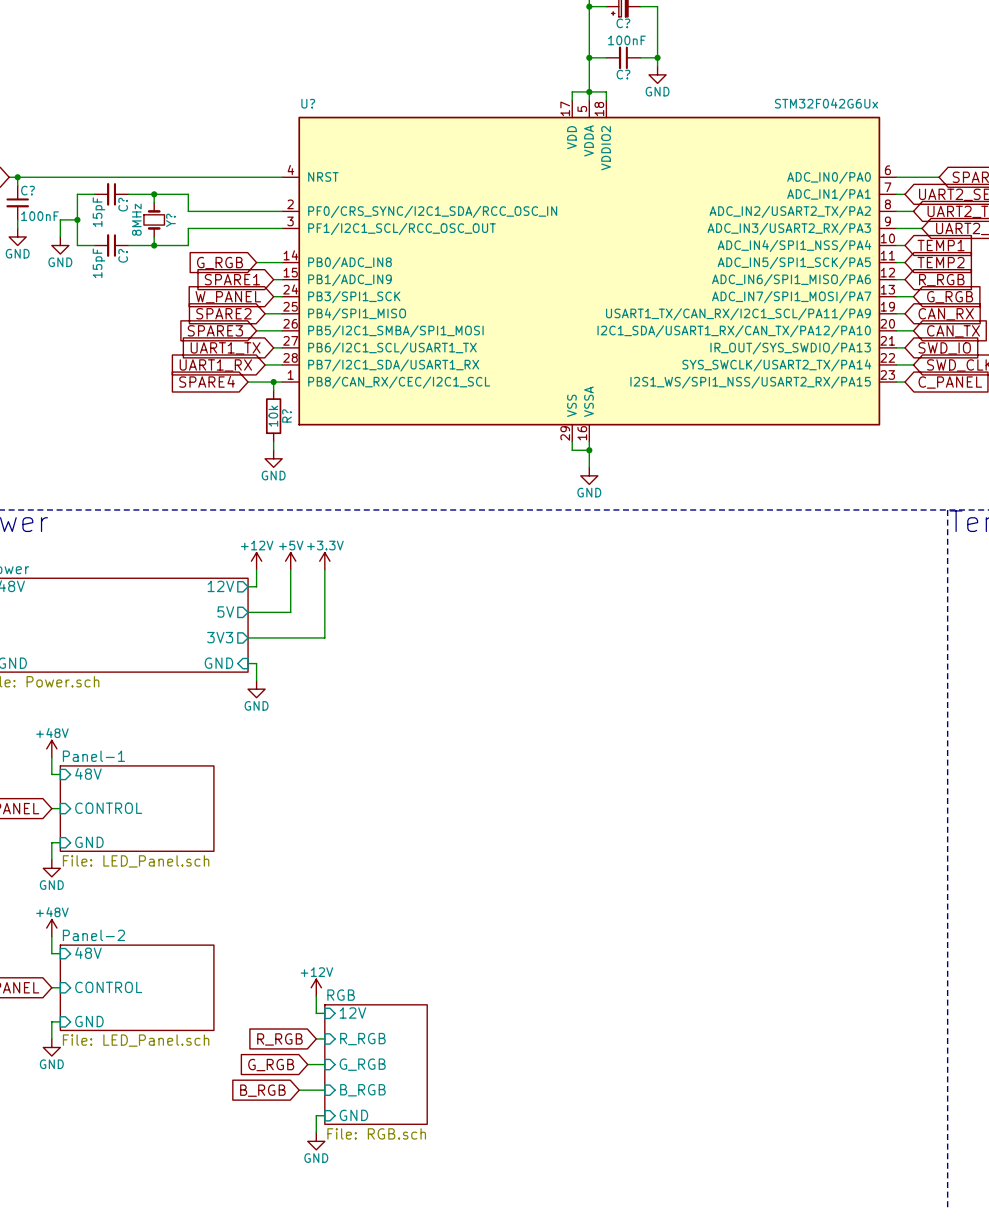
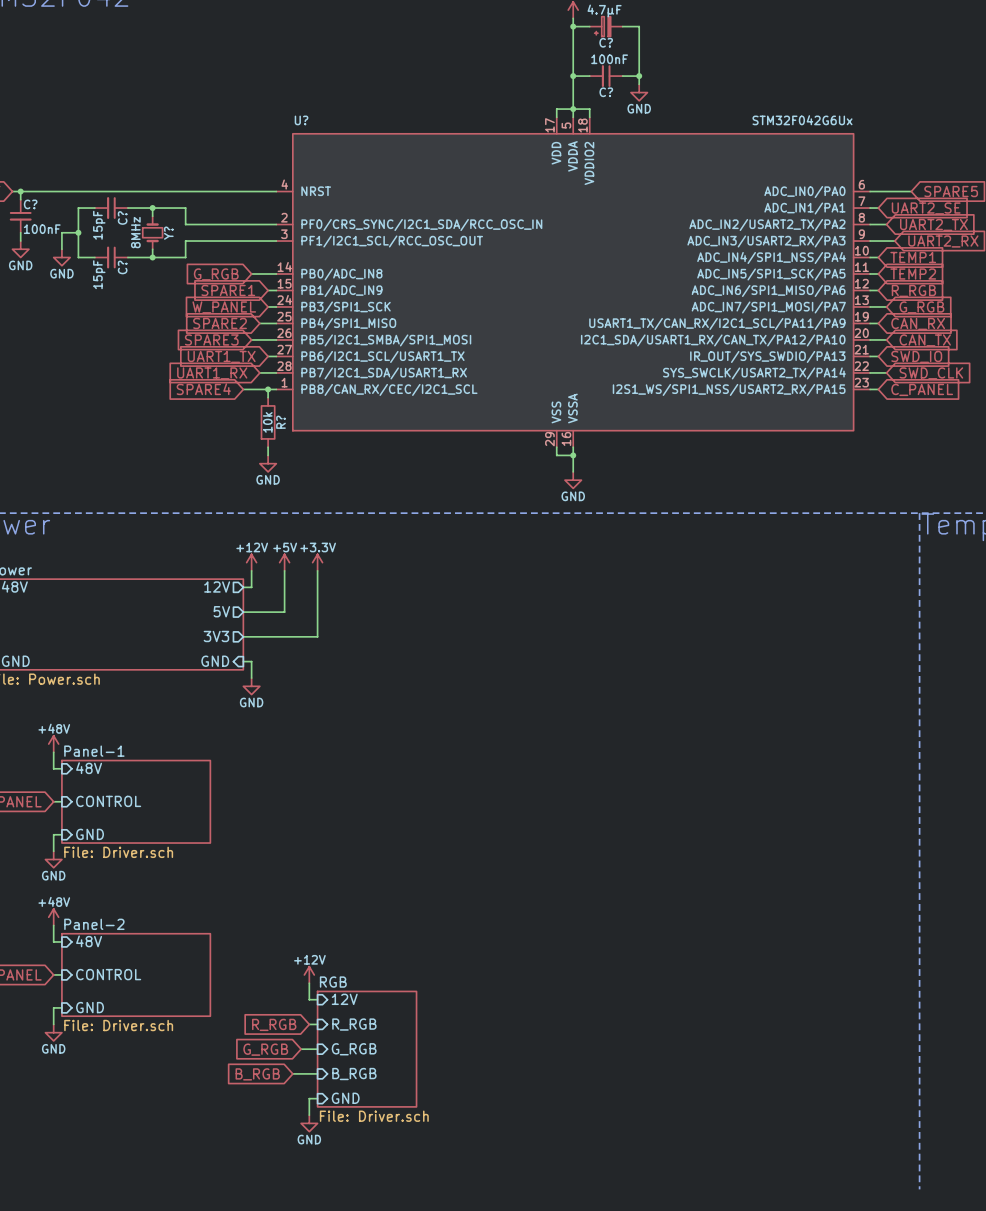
sheet Panel-1 value: File: LED_Panel.sch (136, 861) -> File: Driver.sch (118, 852)
sheet Panel-2 value: File: LED_Panel.sch (136, 1040) -> File: Driver.sch (118, 1025)
sheet RGB value: File: RGB.sch (376, 1133) -> File: Driver.sch (374, 1116)

